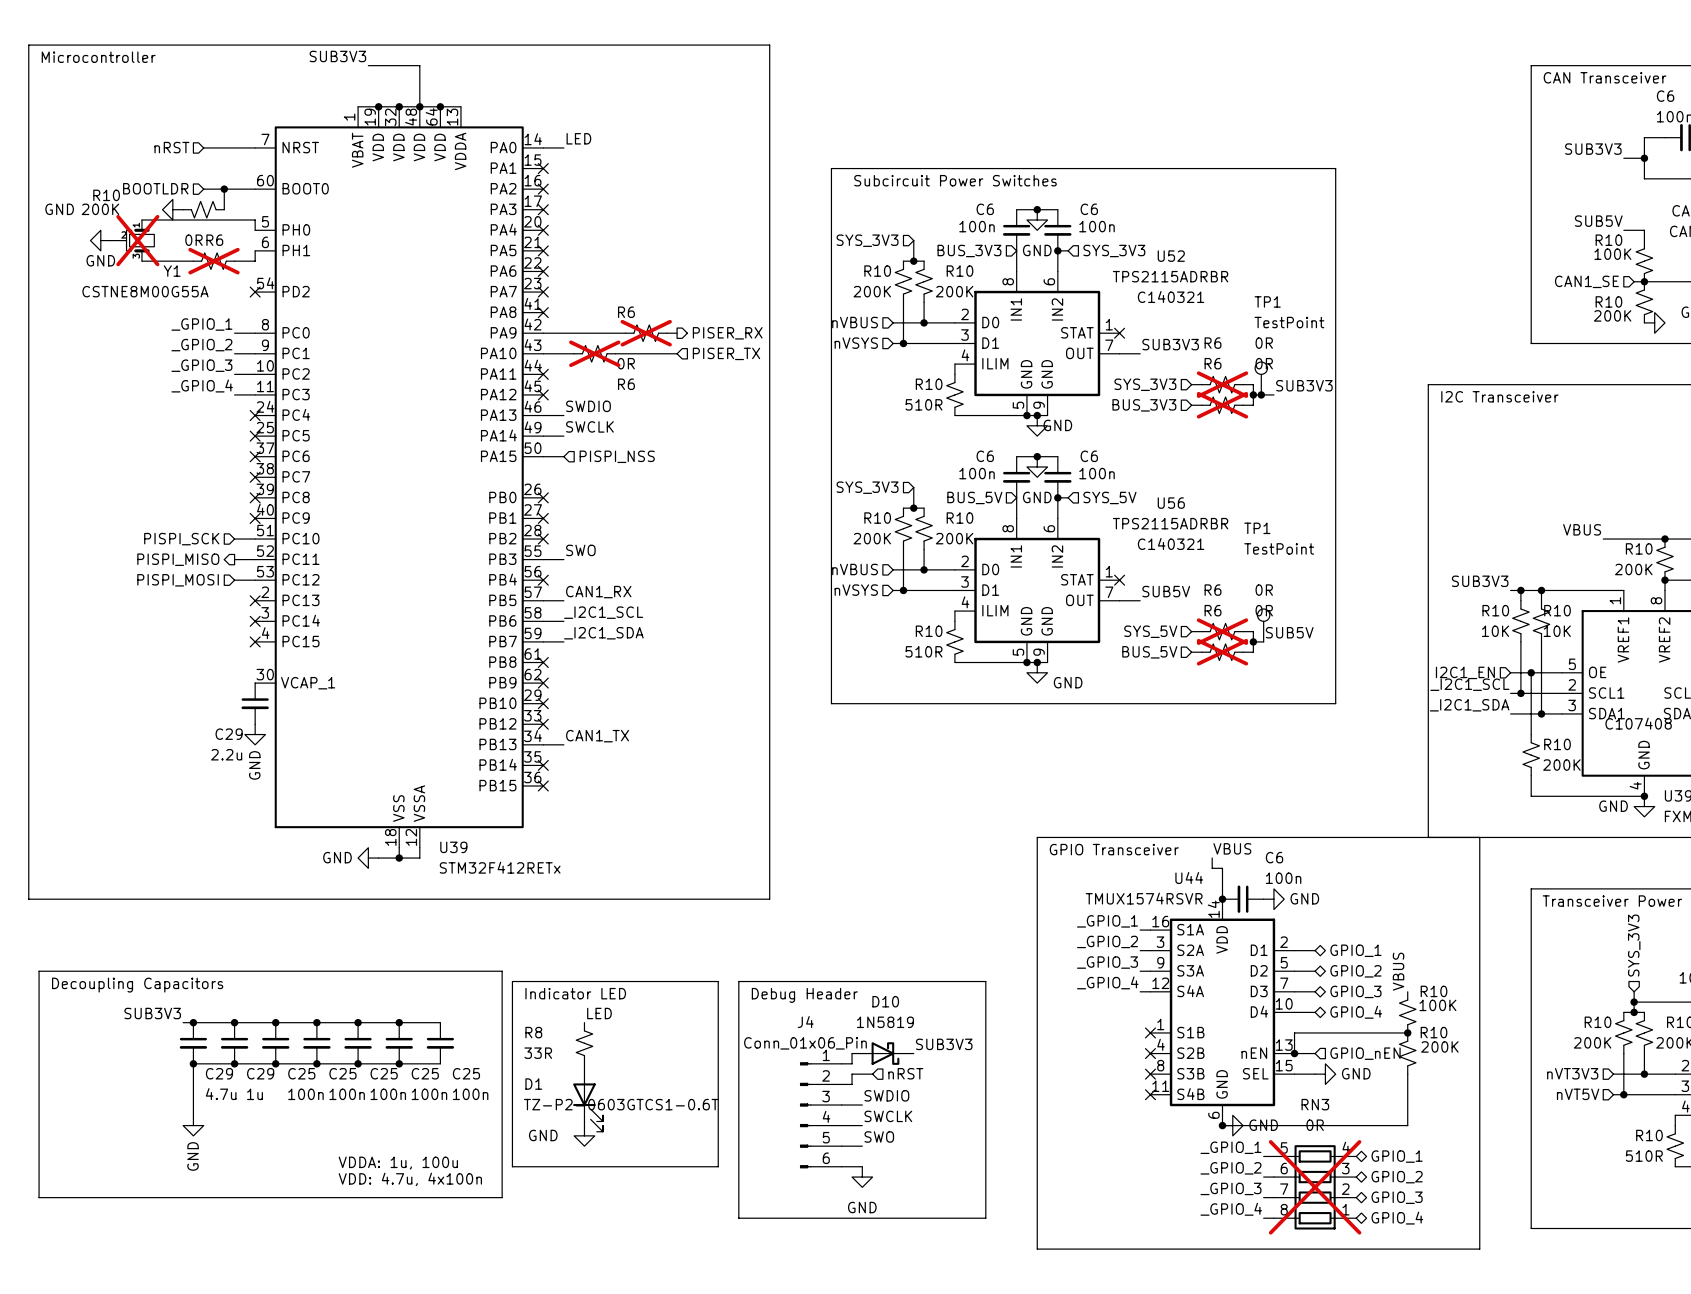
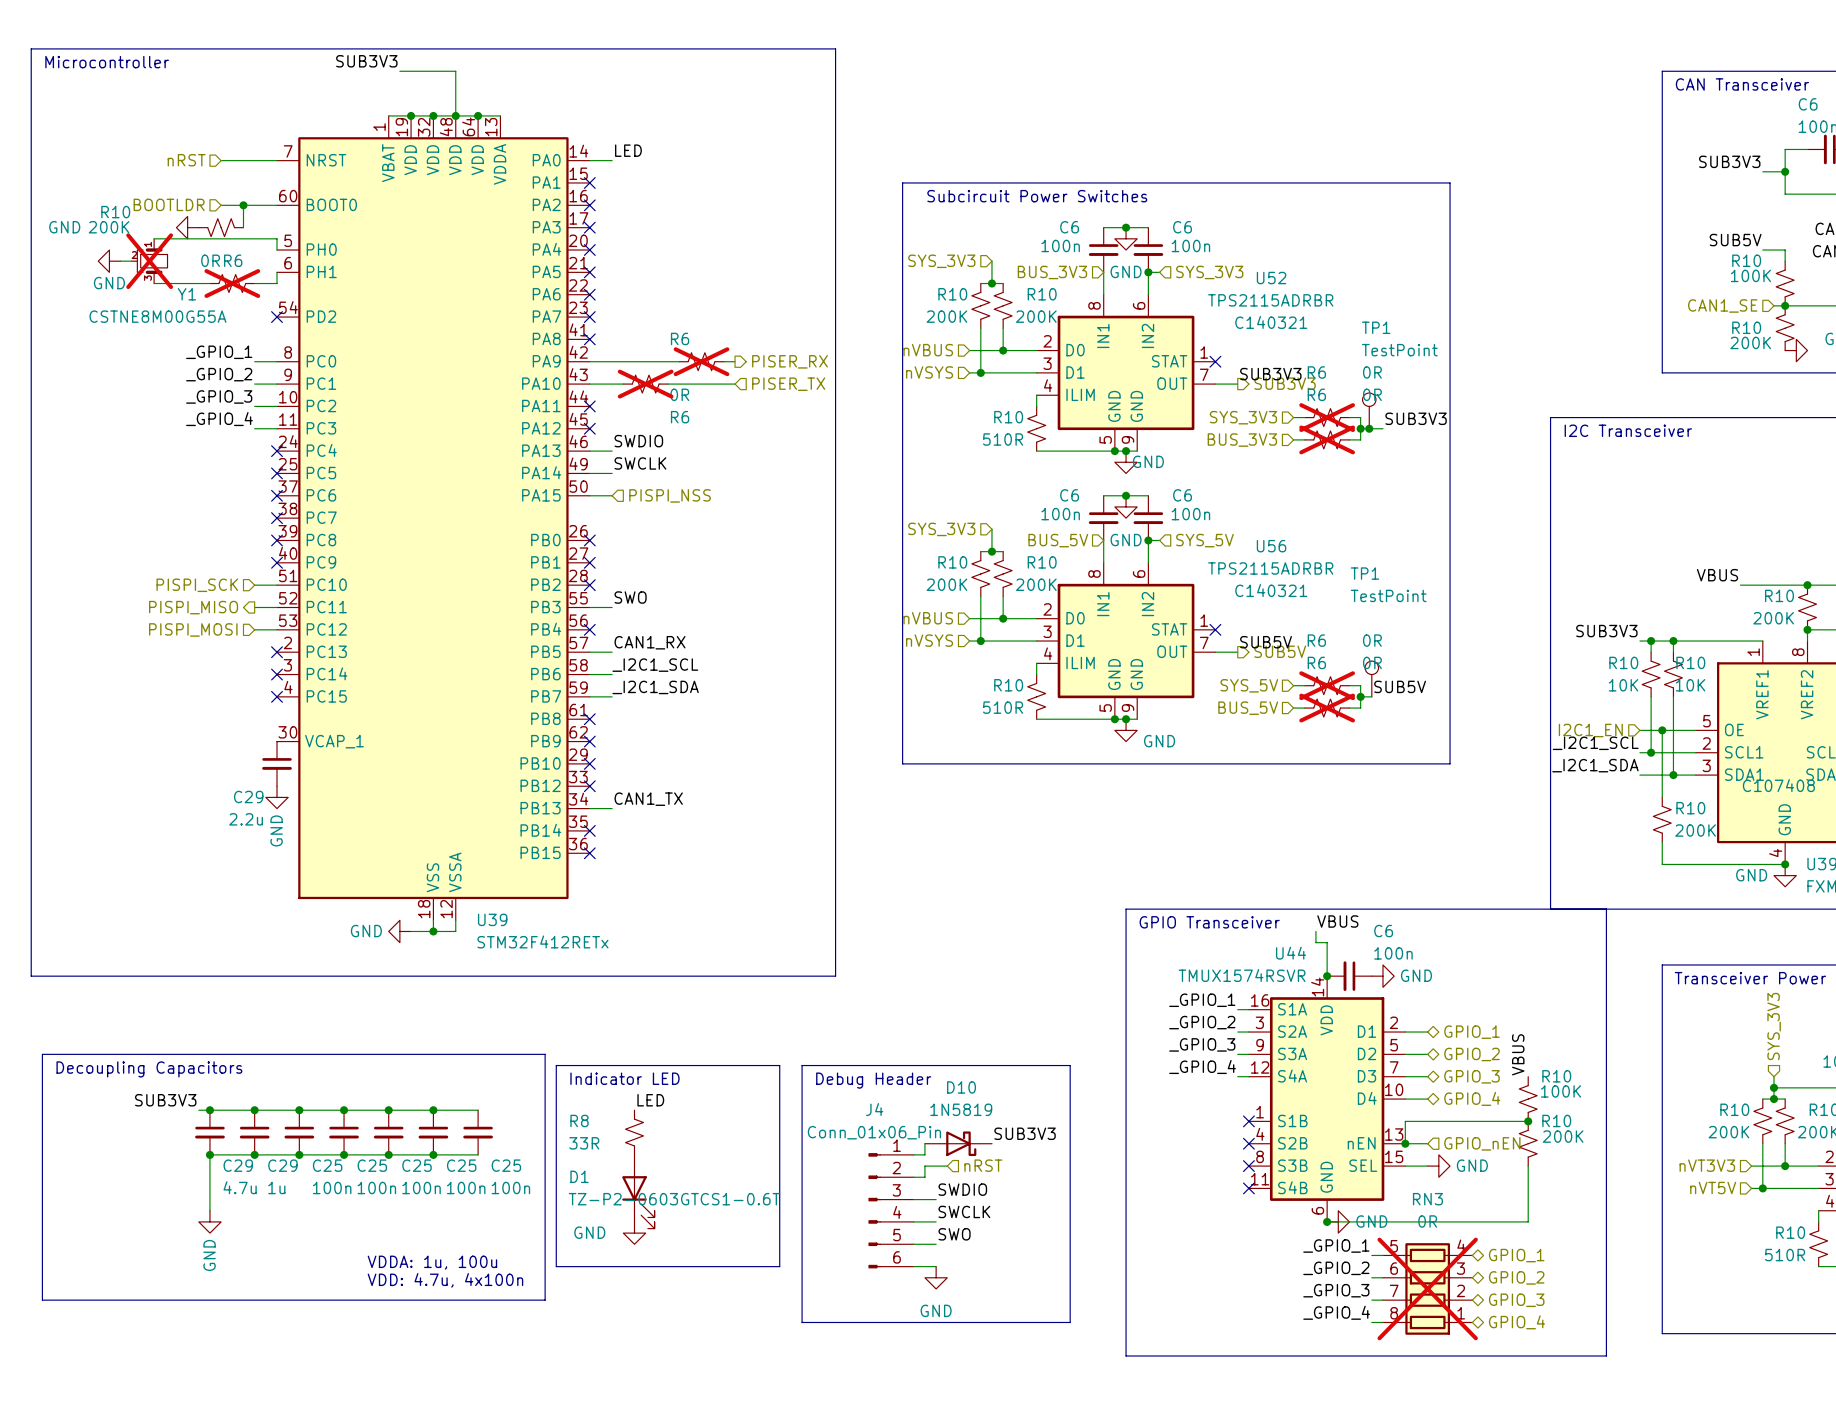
hierarchical label: none -> SUB3V3 (1285, 383)
hierarchical label: none -> SUB5V (1280, 651)

